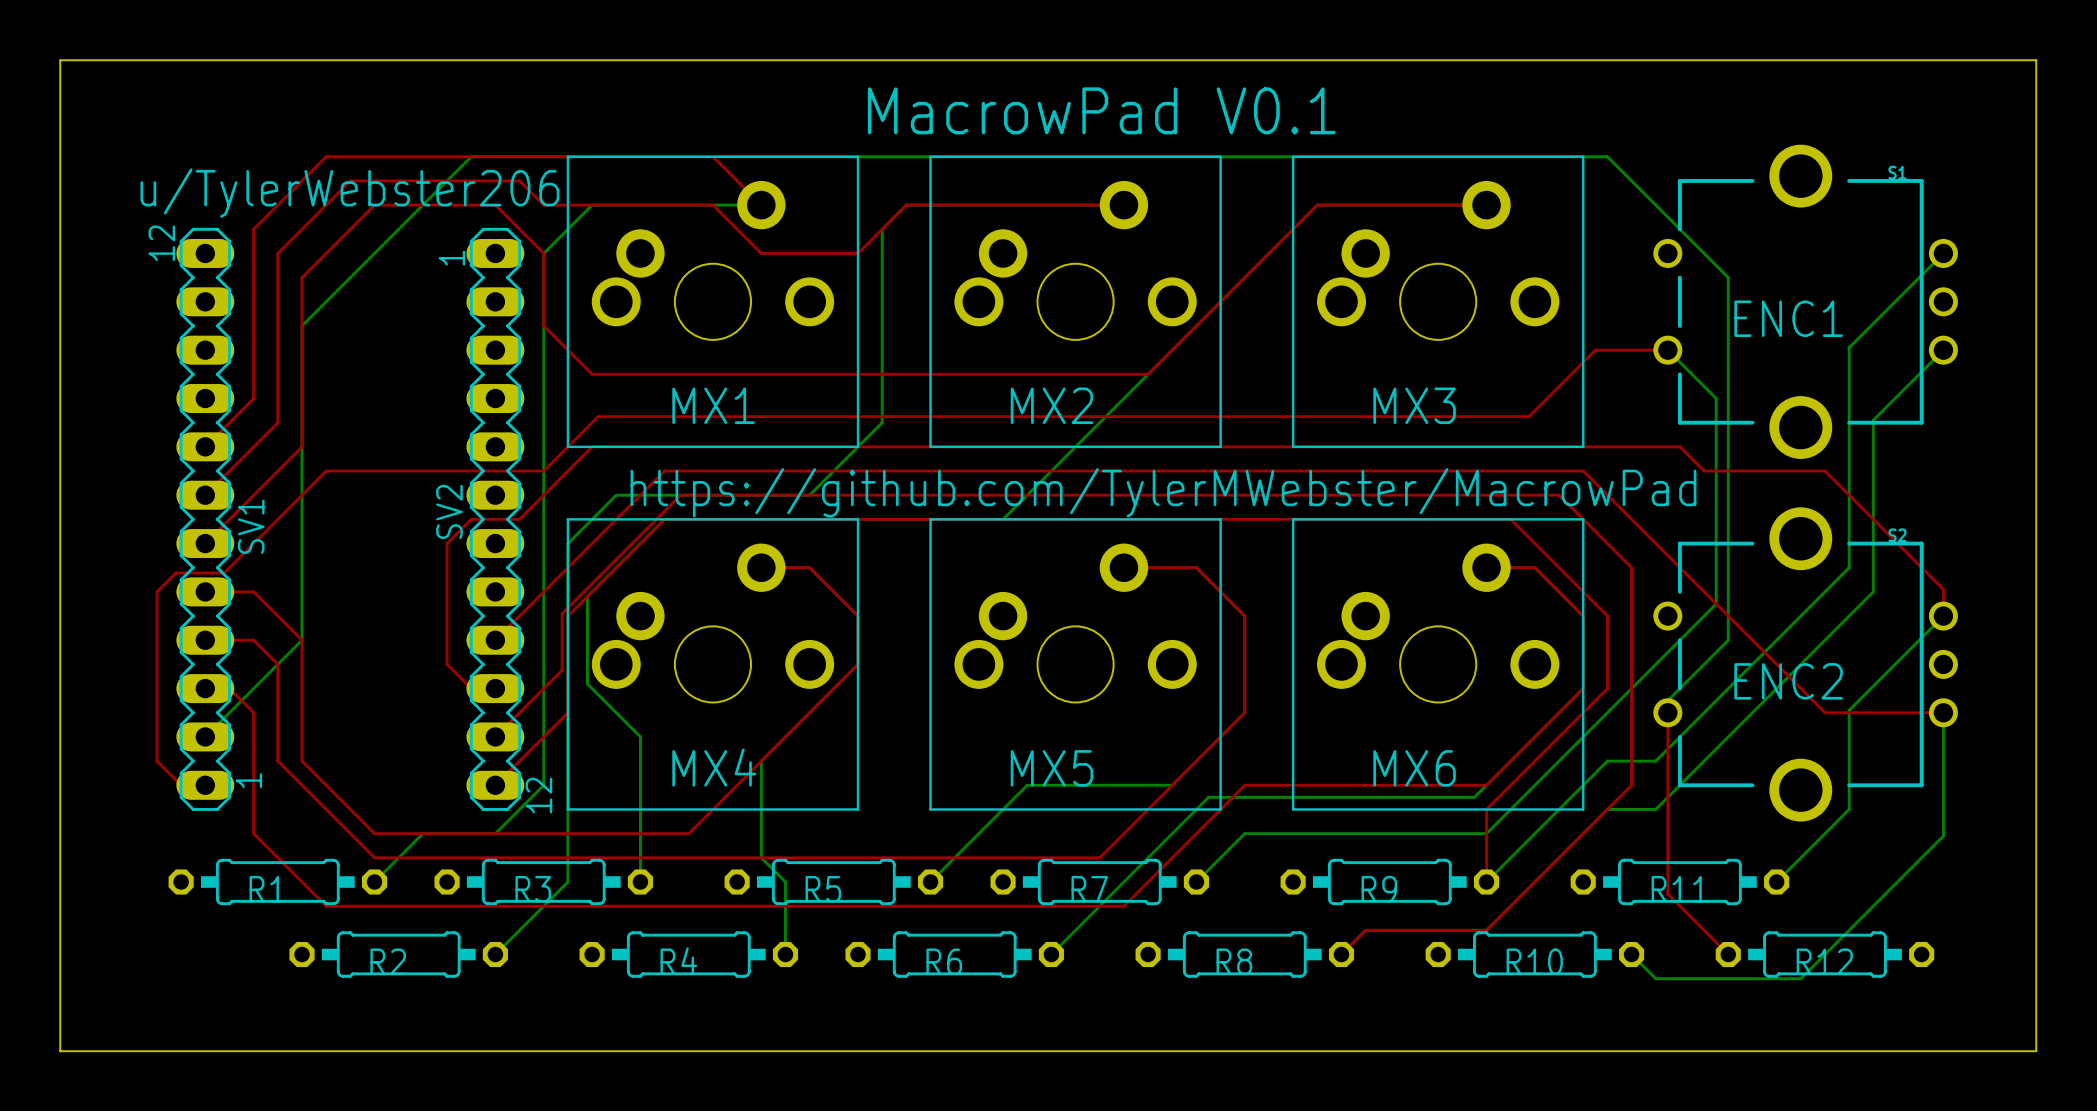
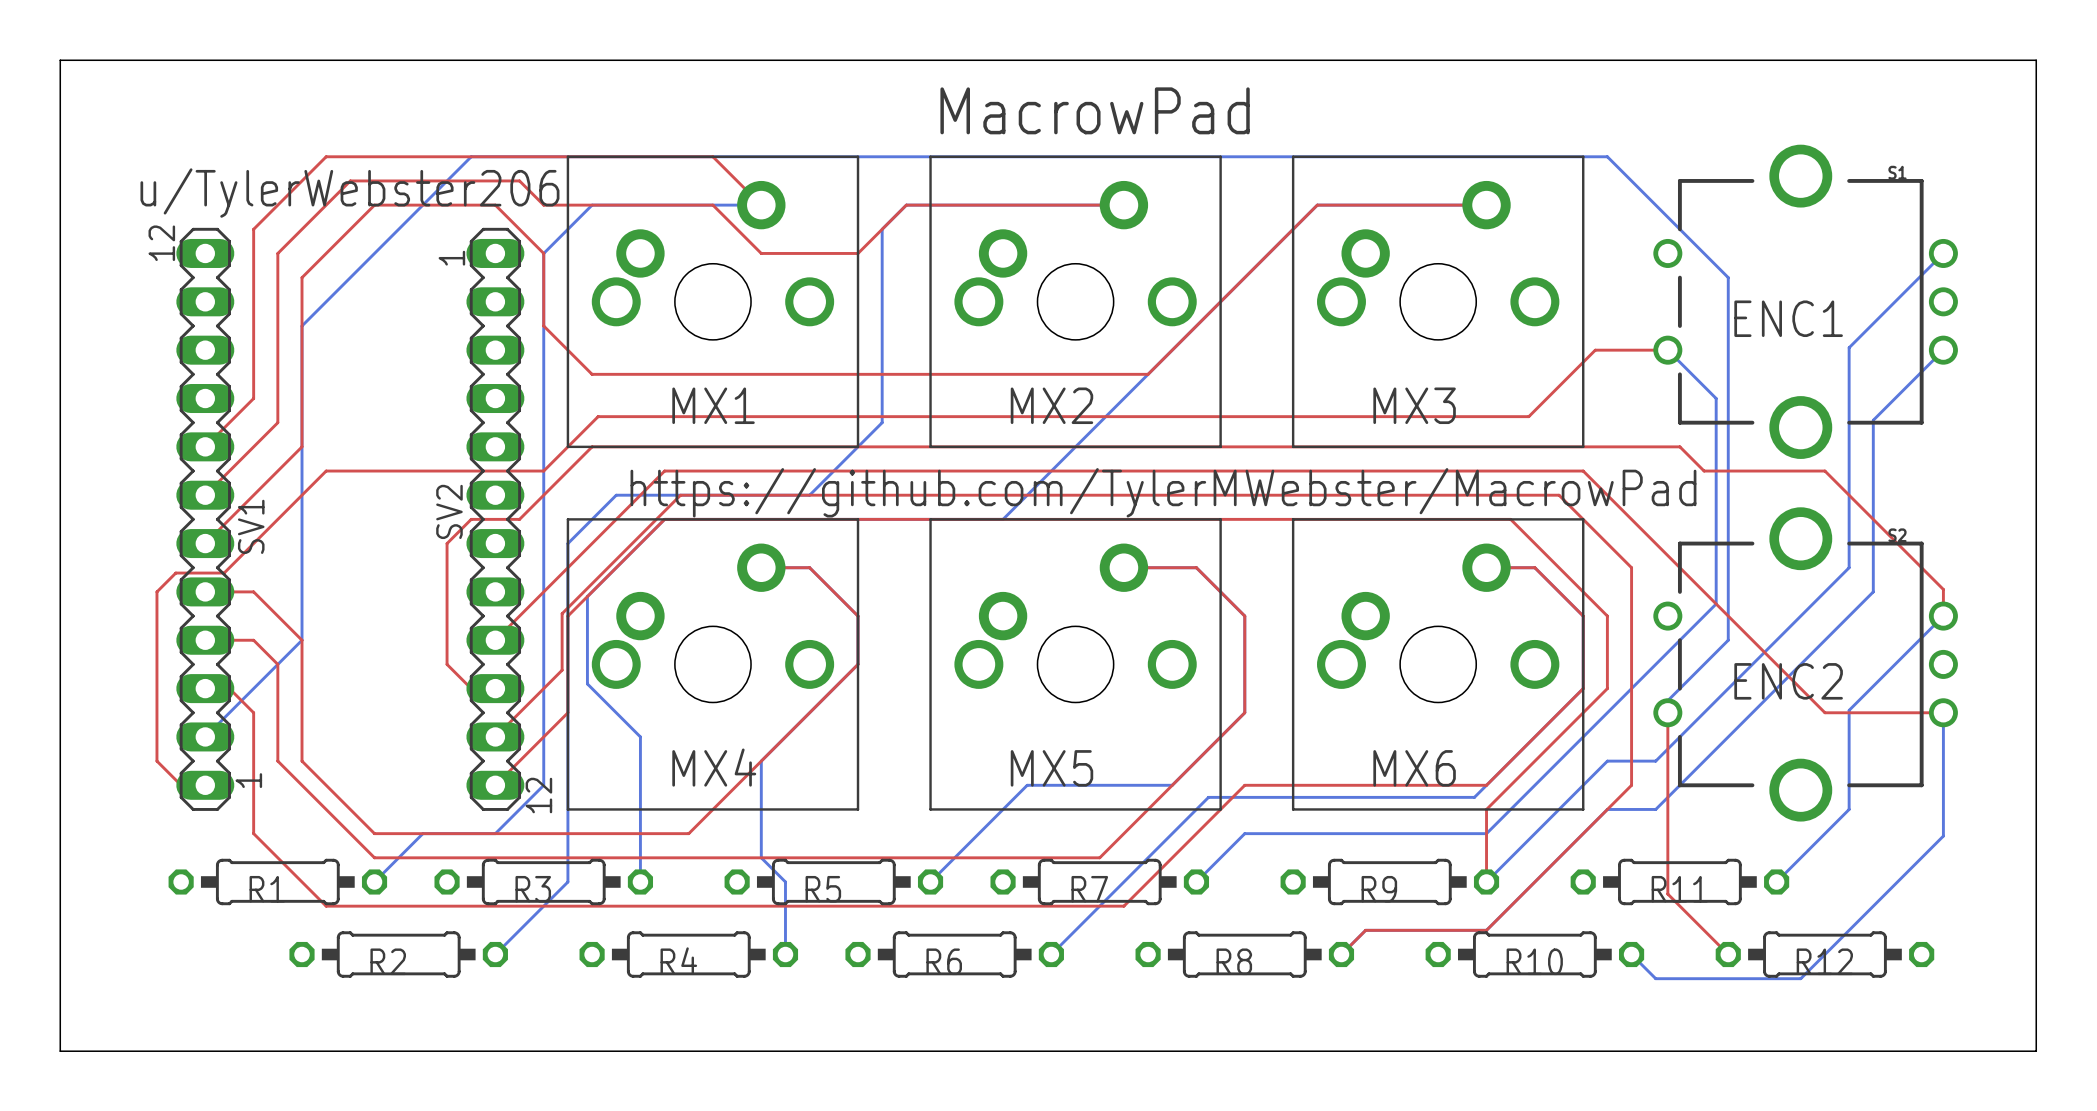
text: MacrowPad V0.1 (1101, 110) -> MacrowPad (1095, 110)

